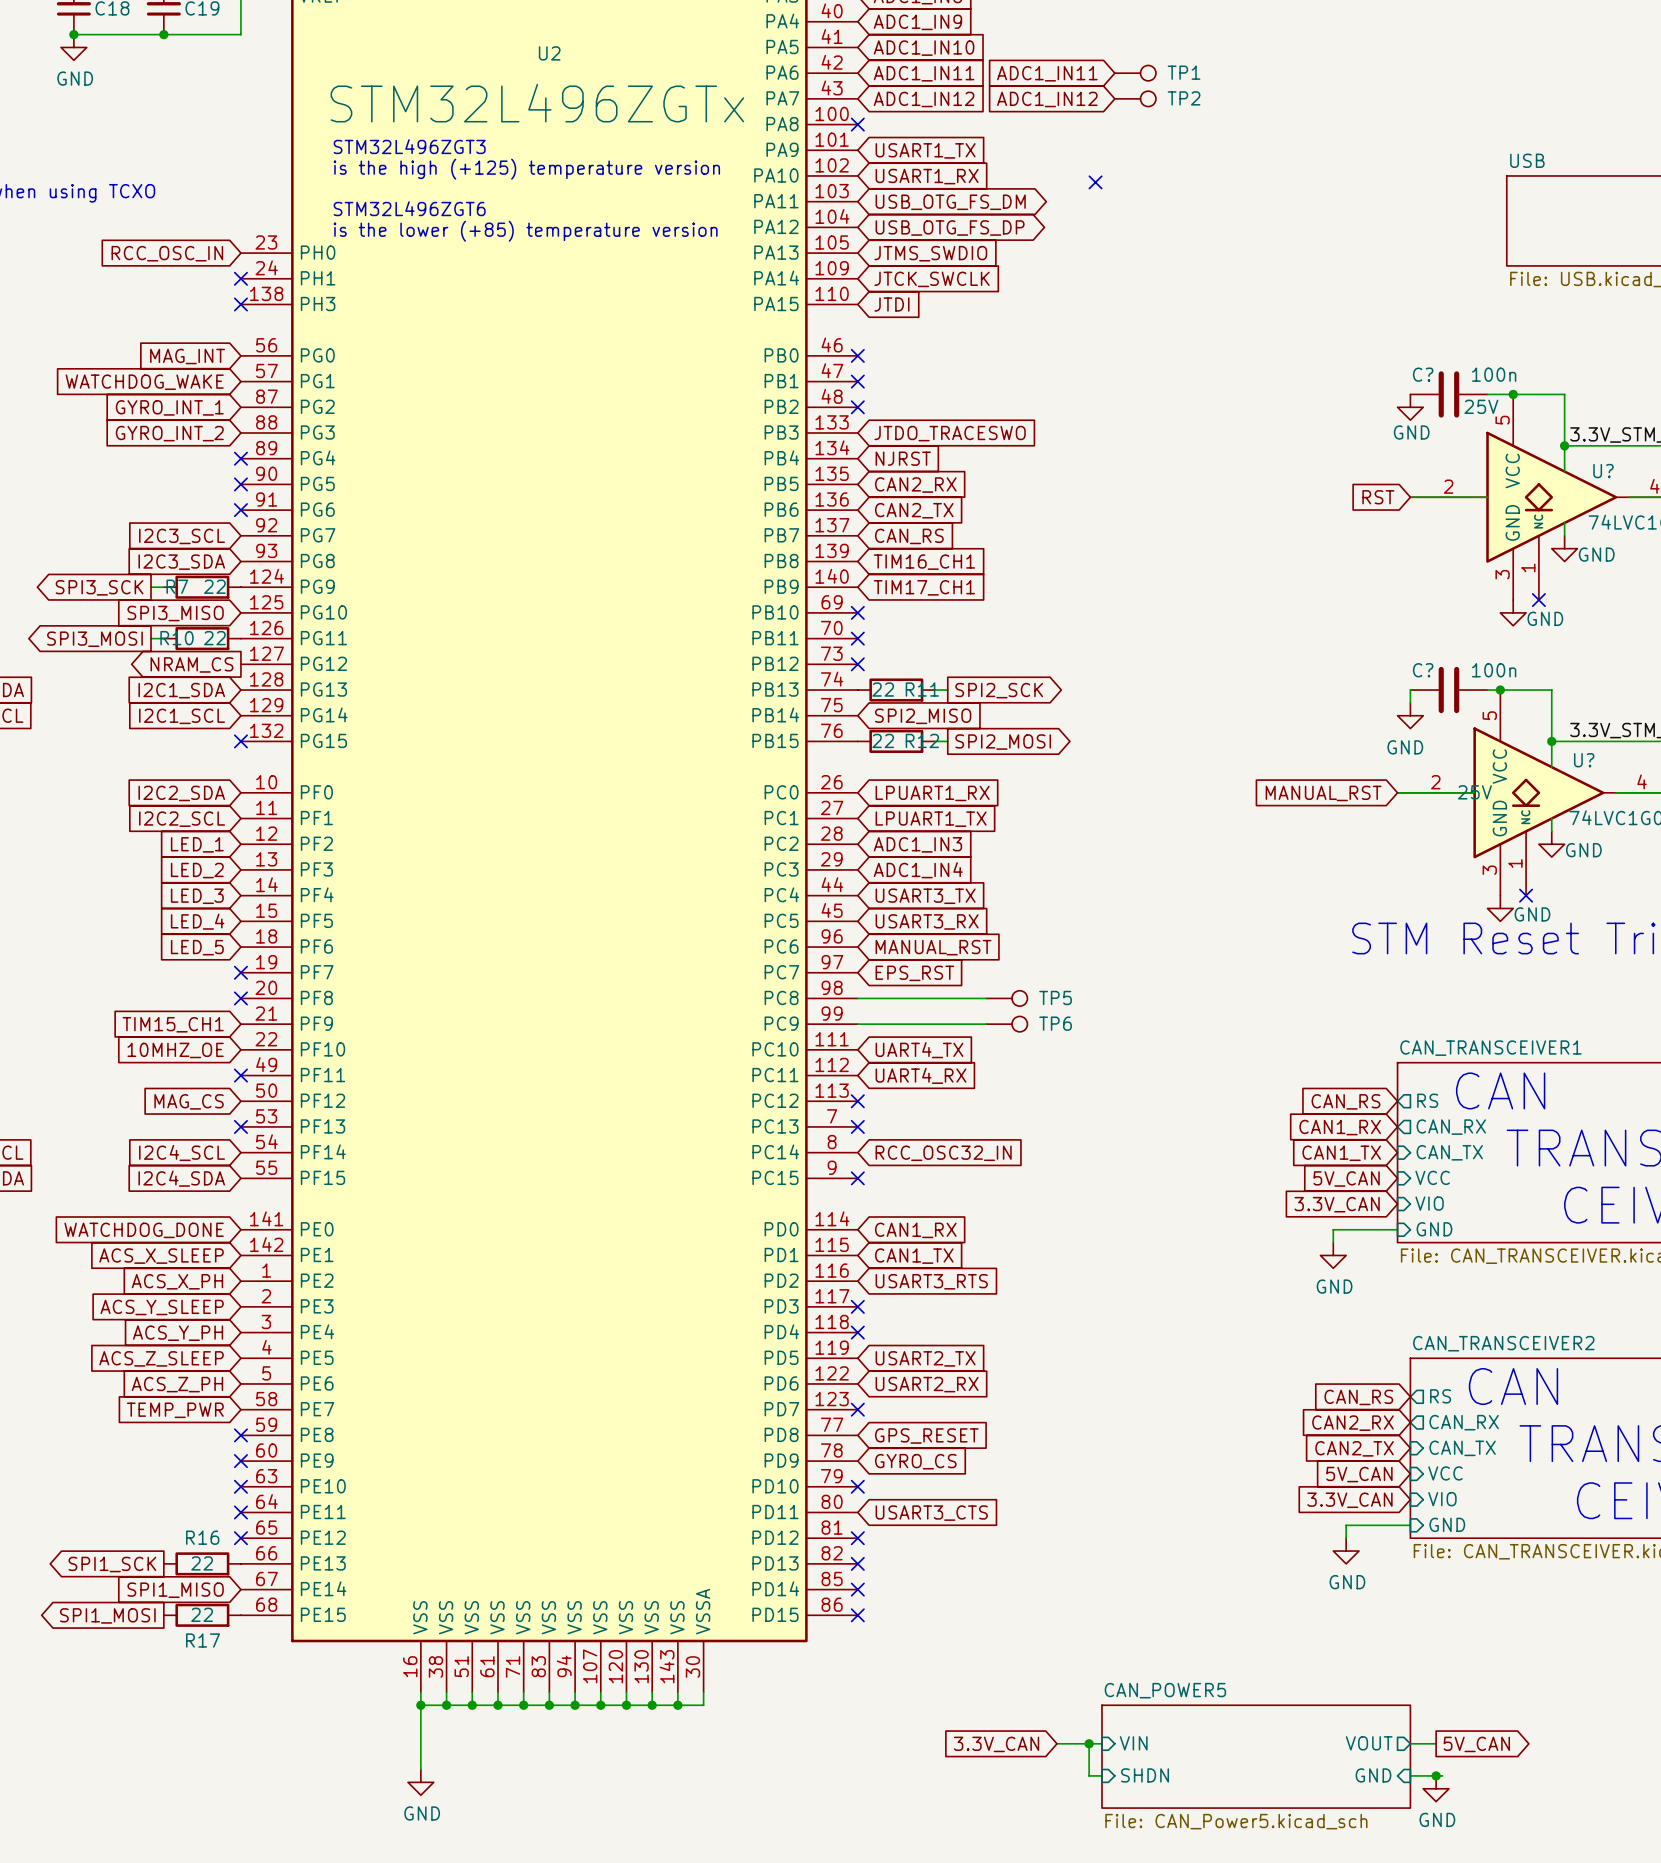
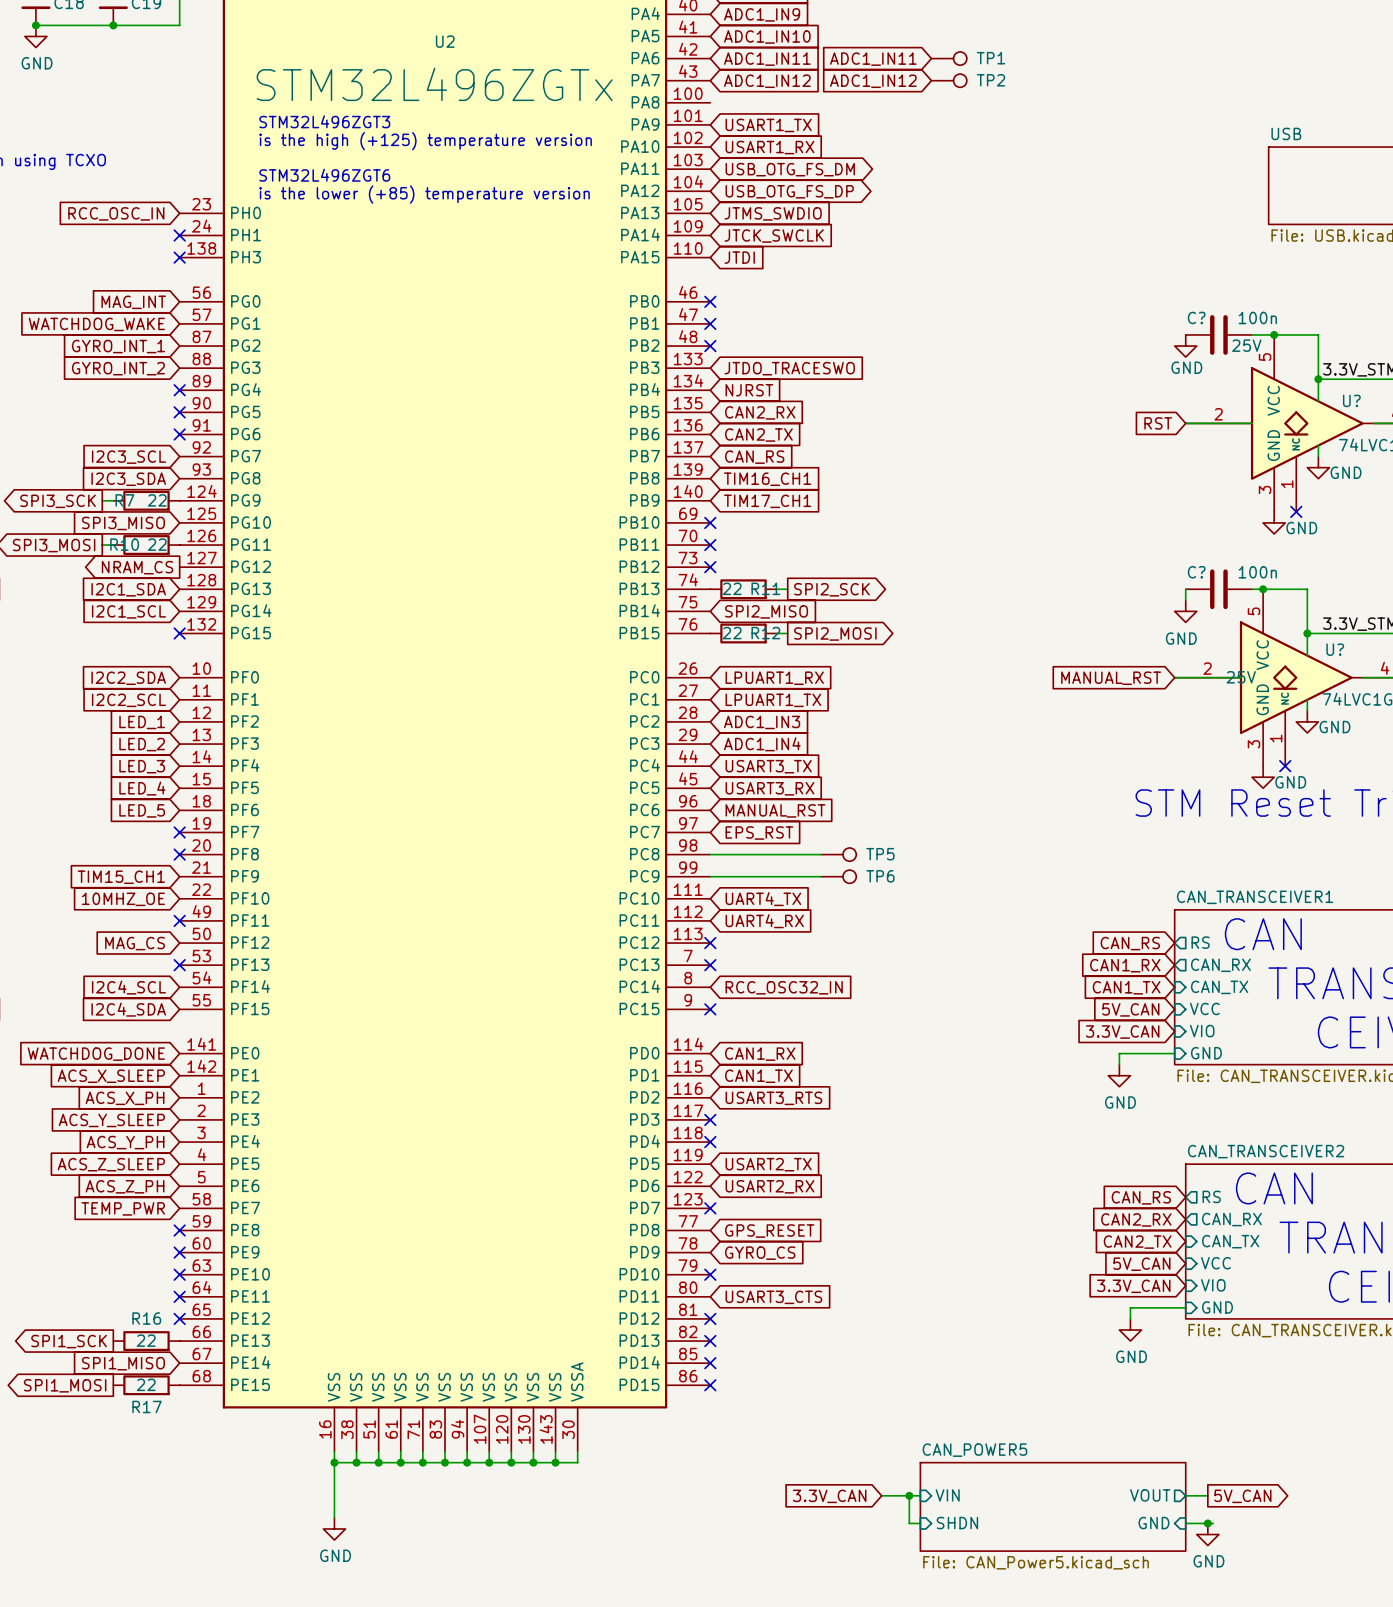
no-connect mark: (857, 124) -> none
no-connect mark: (1095, 182) -> none

